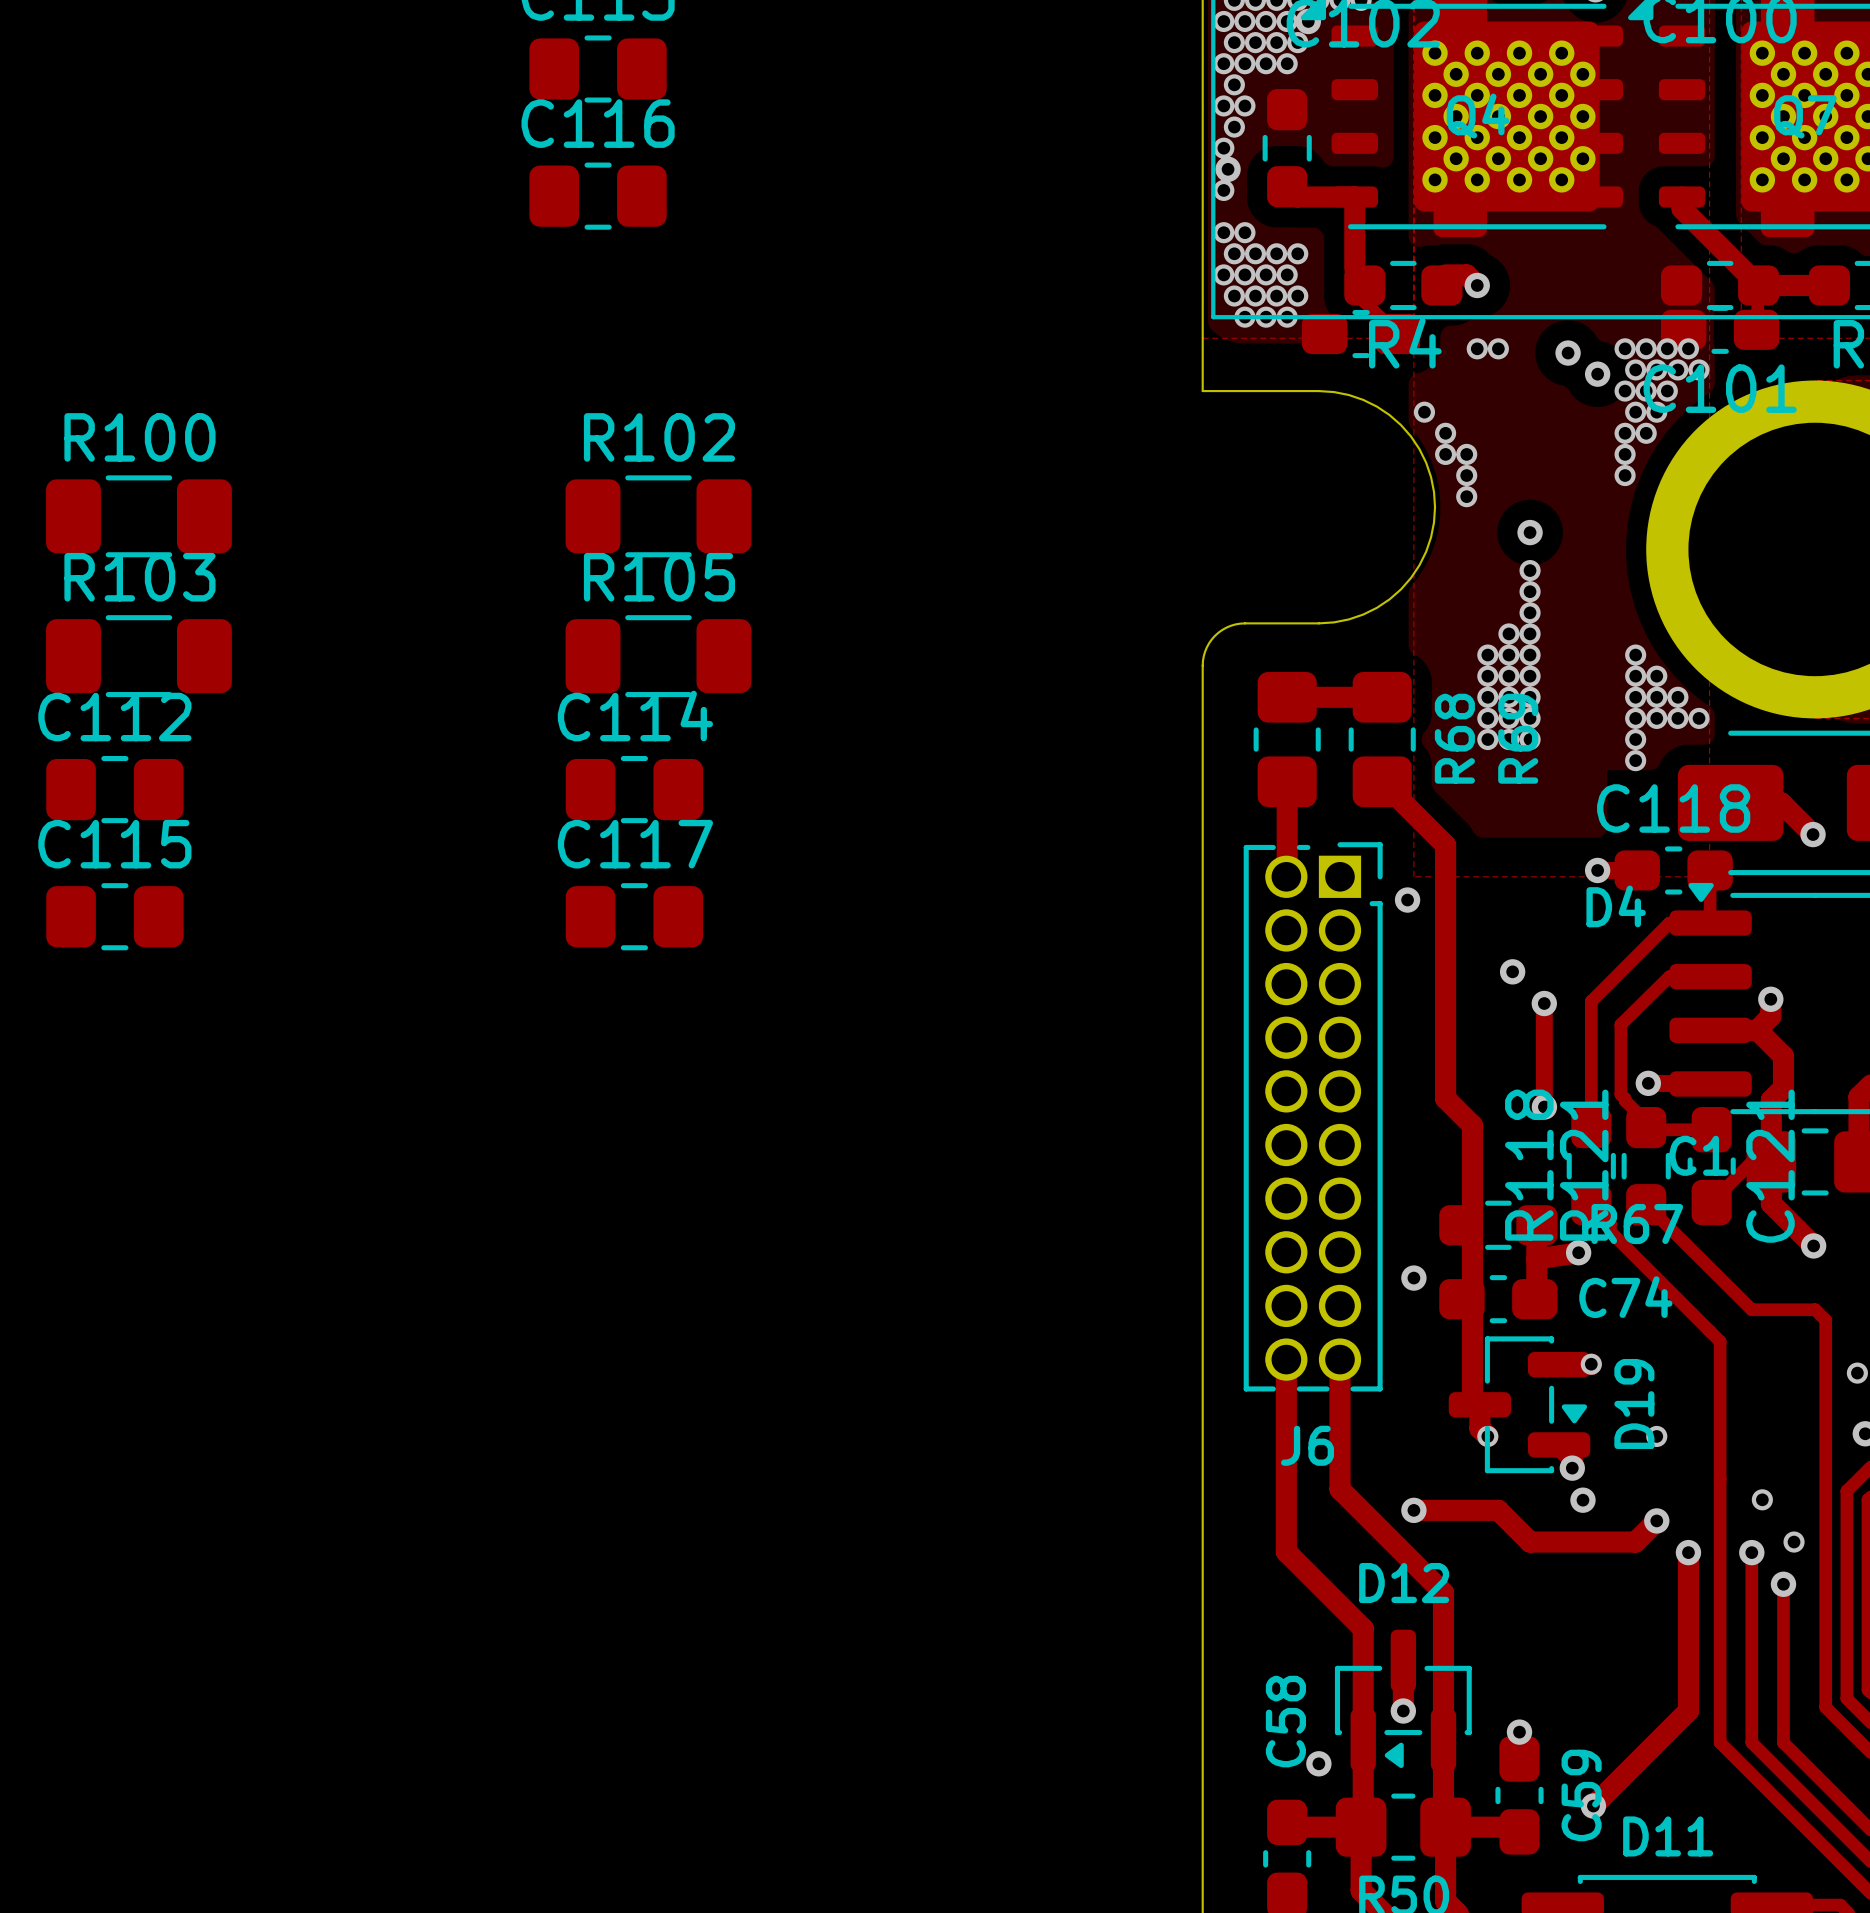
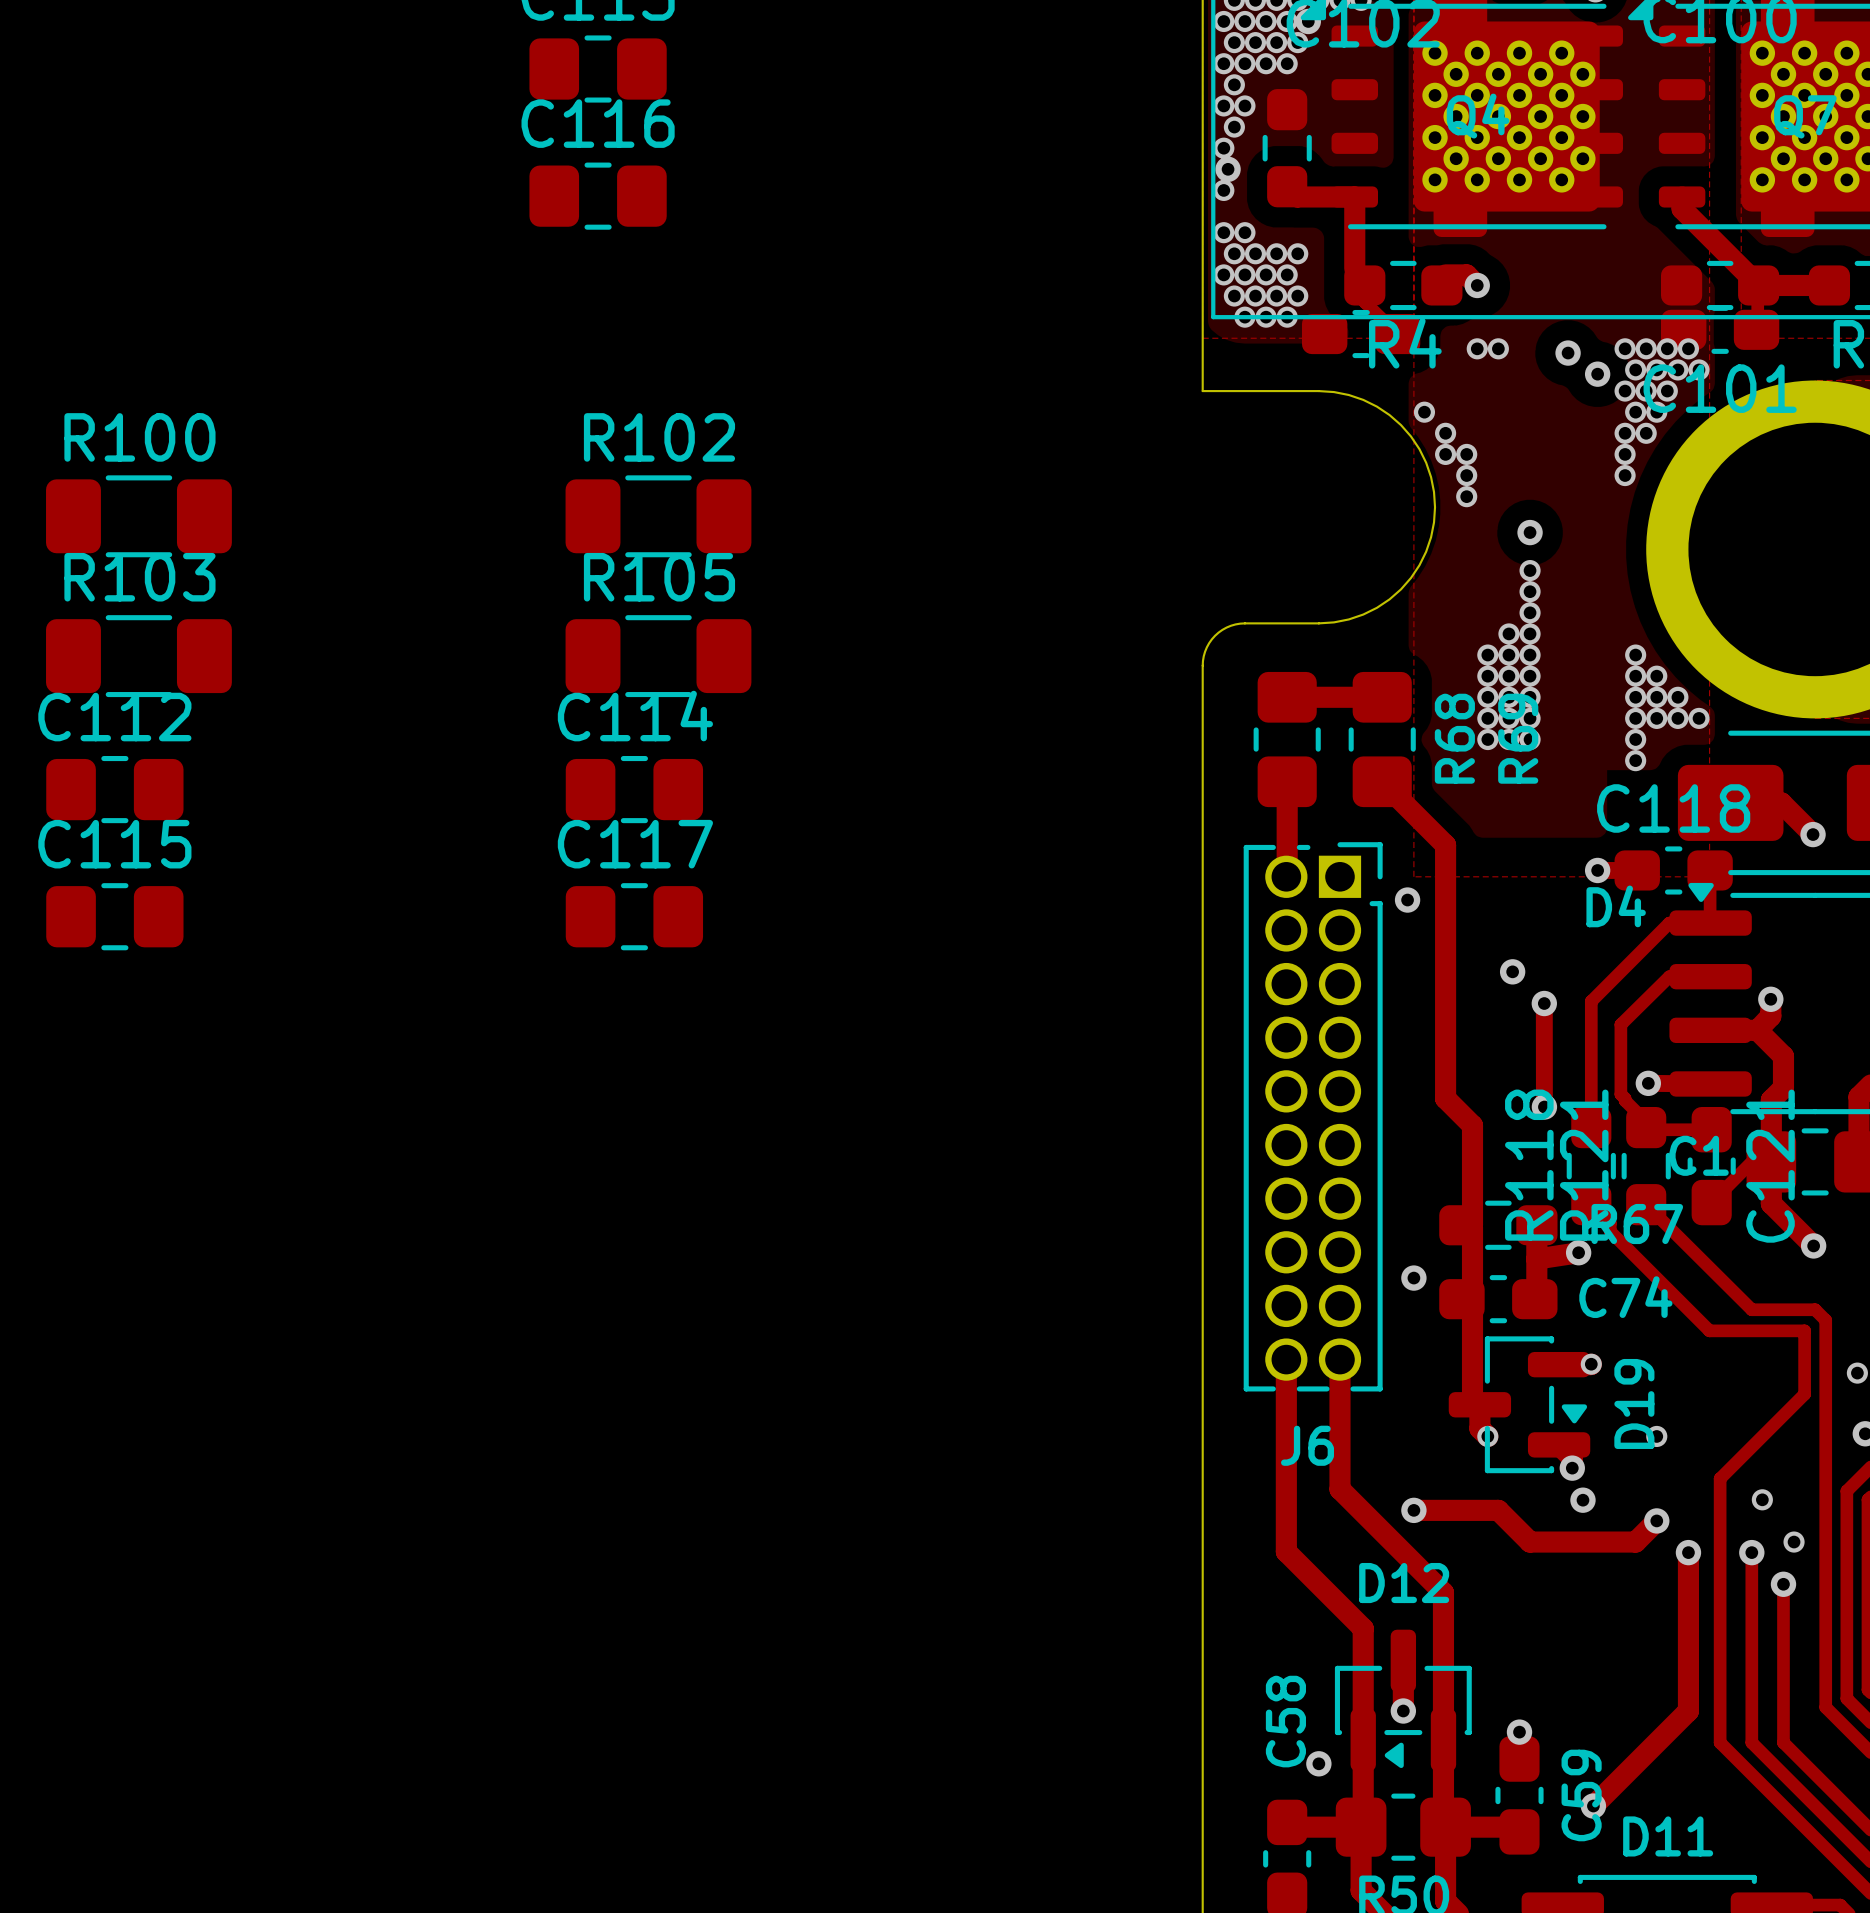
track: (1709, 1330) (1720, 1341) (1720, 1478) -> (1709, 1330) (1804, 1330) (1804, 1394) (1720, 1478)

